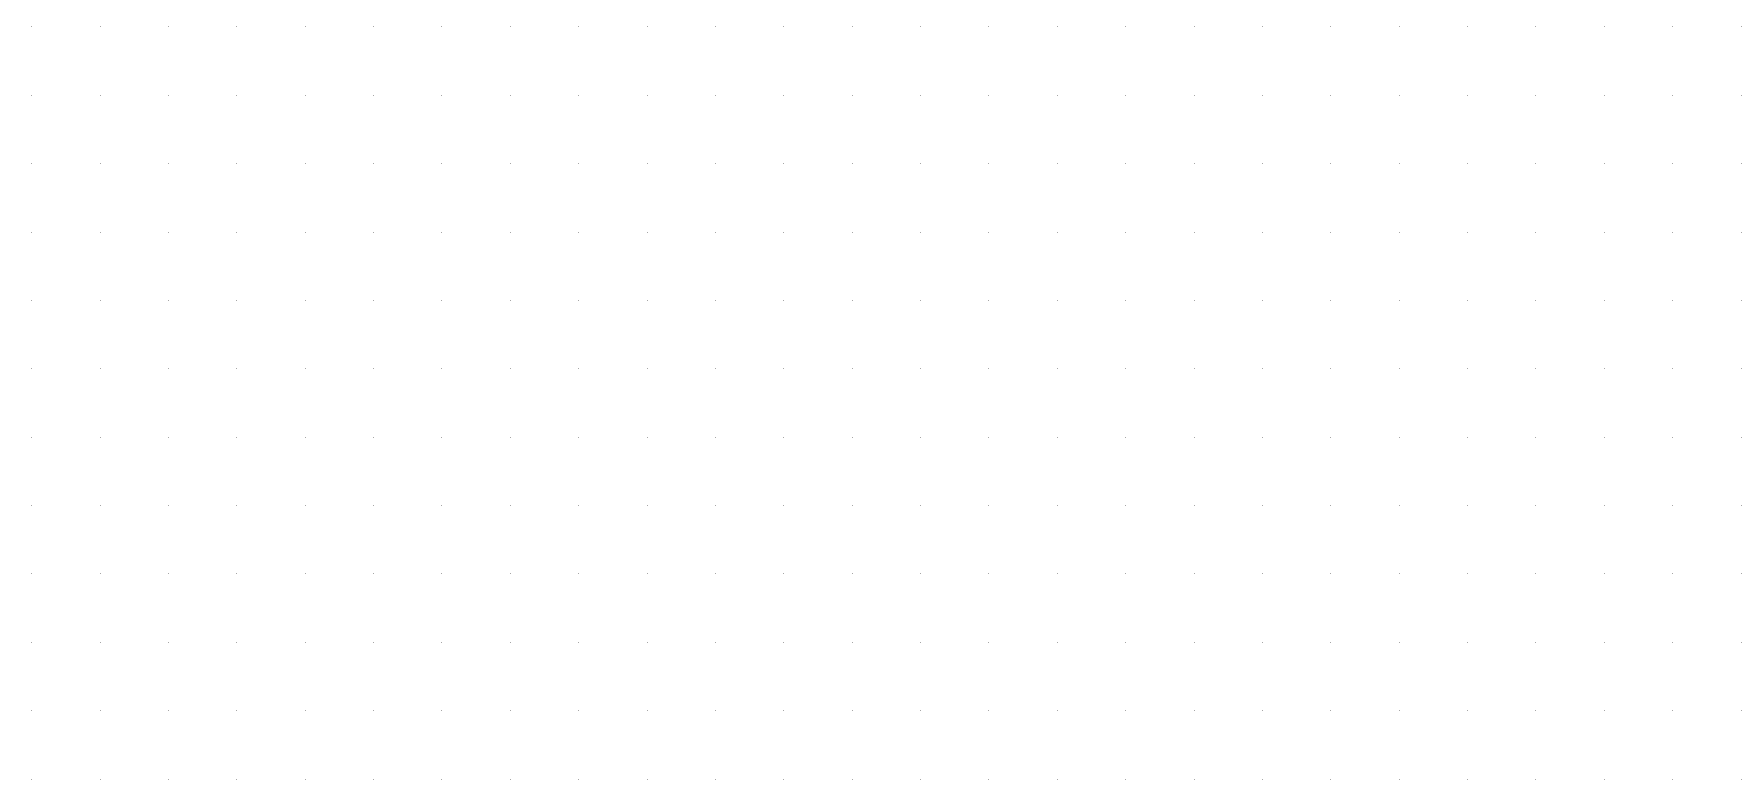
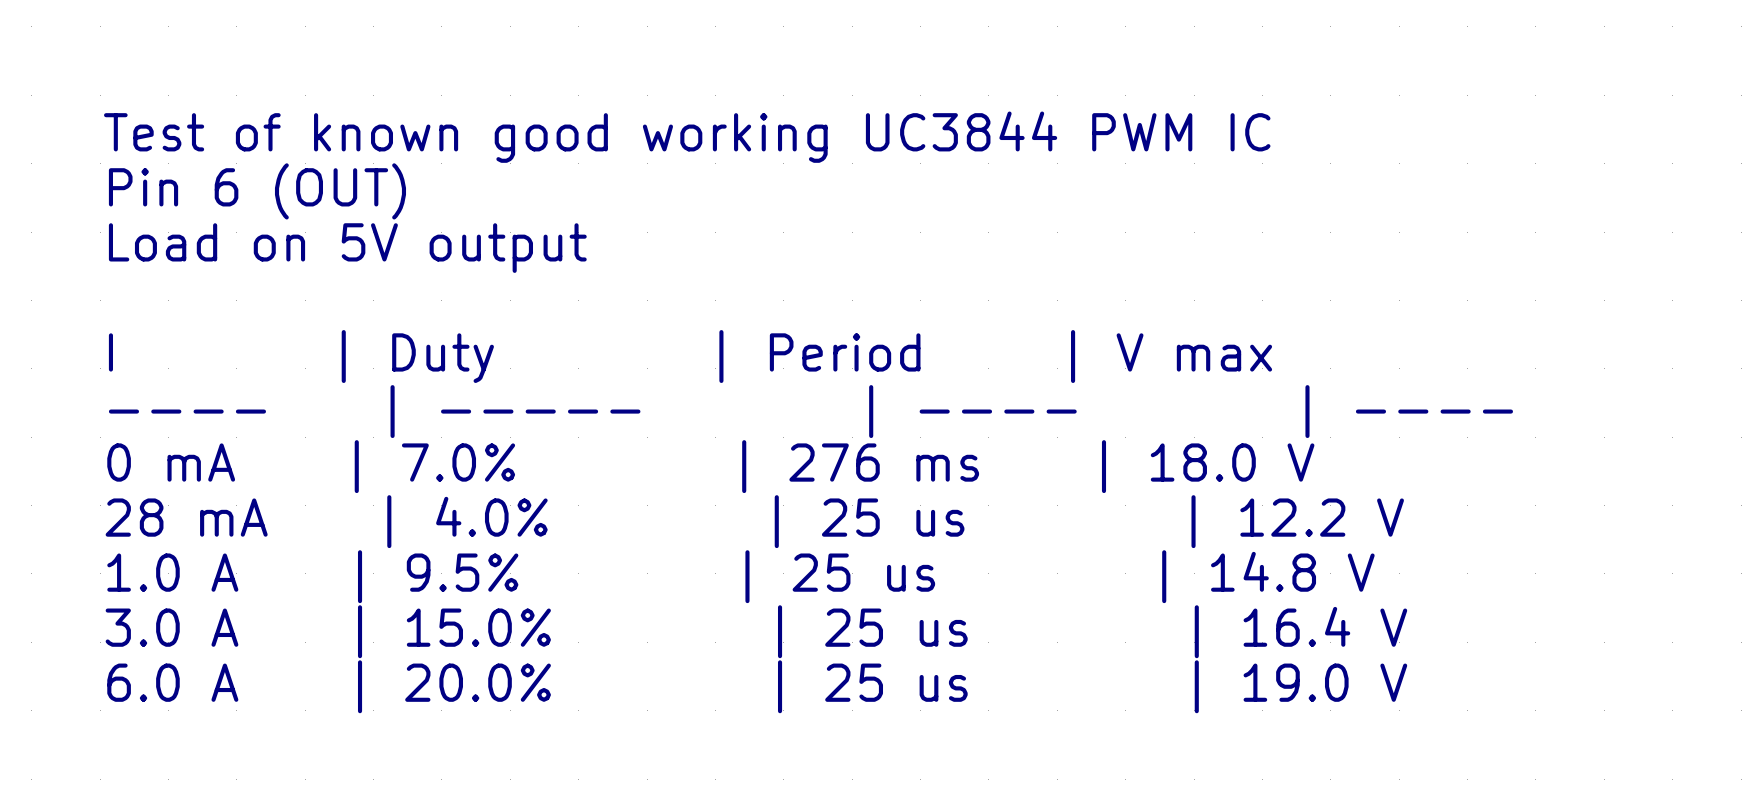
text: none -> Test of known good working UC3844 PWM IC (687, 137)
text: none -> Pin 6 (OUT) (257, 191)
text: none -> Load on 5V output (347, 248)
text: none -> I | Duty | Period | V max (690, 356)
text: none -> ---- | ----- | ---- | ---- (810, 411)
text: none -> 0 mA | 7.0% | 276 ms | 18.0 V (710, 466)
text: none -> 28 mA | 4.0% | 25 us | 12.2 V (754, 521)
text: none -> 1.0 A | 9.5% | 25 us | 14.8 V (740, 576)
text: none -> 3.0 A | 15.0% | 25 us | 16.4 V (756, 631)
text: none -> 6.0 A | 20.0% | 25 us | 19.0 V (757, 686)

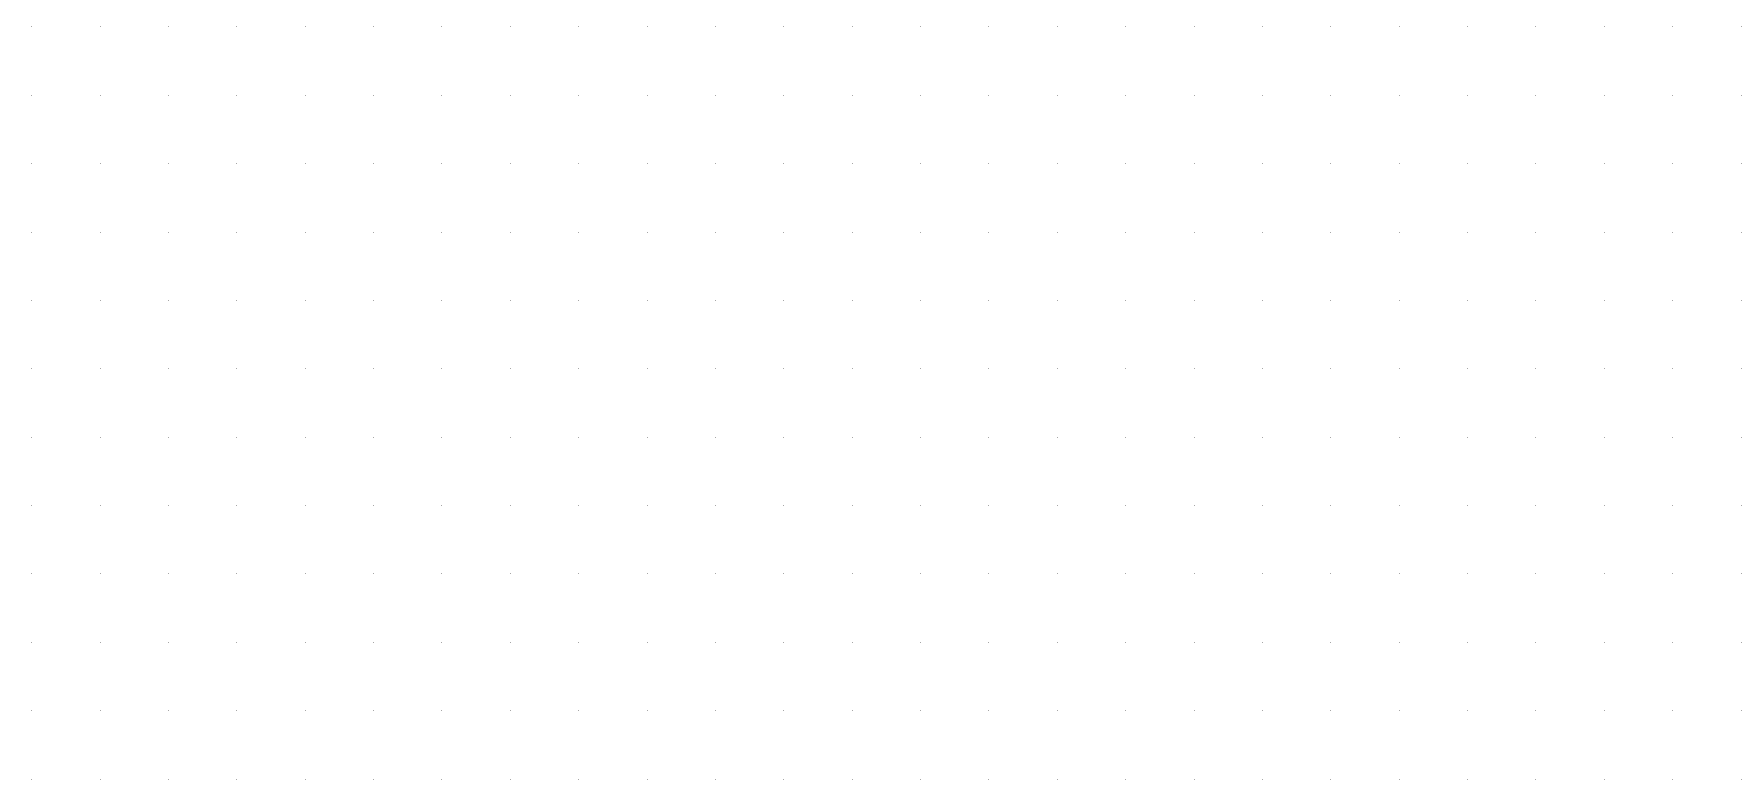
text: Test of known good working UC3844 PWM IC (687, 137) -> none
text: Pin 6 (OUT) (257, 191) -> none
text: Load on 5V output (347, 248) -> none
text: I | Duty | Period | V max (690, 356) -> none
text: ---- | ----- | ---- | ---- (810, 411) -> none
text: 0 mA | 7.0% | 276 ms | 18.0 V (710, 466) -> none
text: 28 mA | 4.0% | 25 us | 12.2 V (754, 521) -> none
text: 1.0 A | 9.5% | 25 us | 14.8 V (740, 576) -> none
text: 3.0 A | 15.0% | 25 us | 16.4 V (756, 631) -> none
text: 6.0 A | 20.0% | 25 us | 19.0 V (757, 686) -> none

